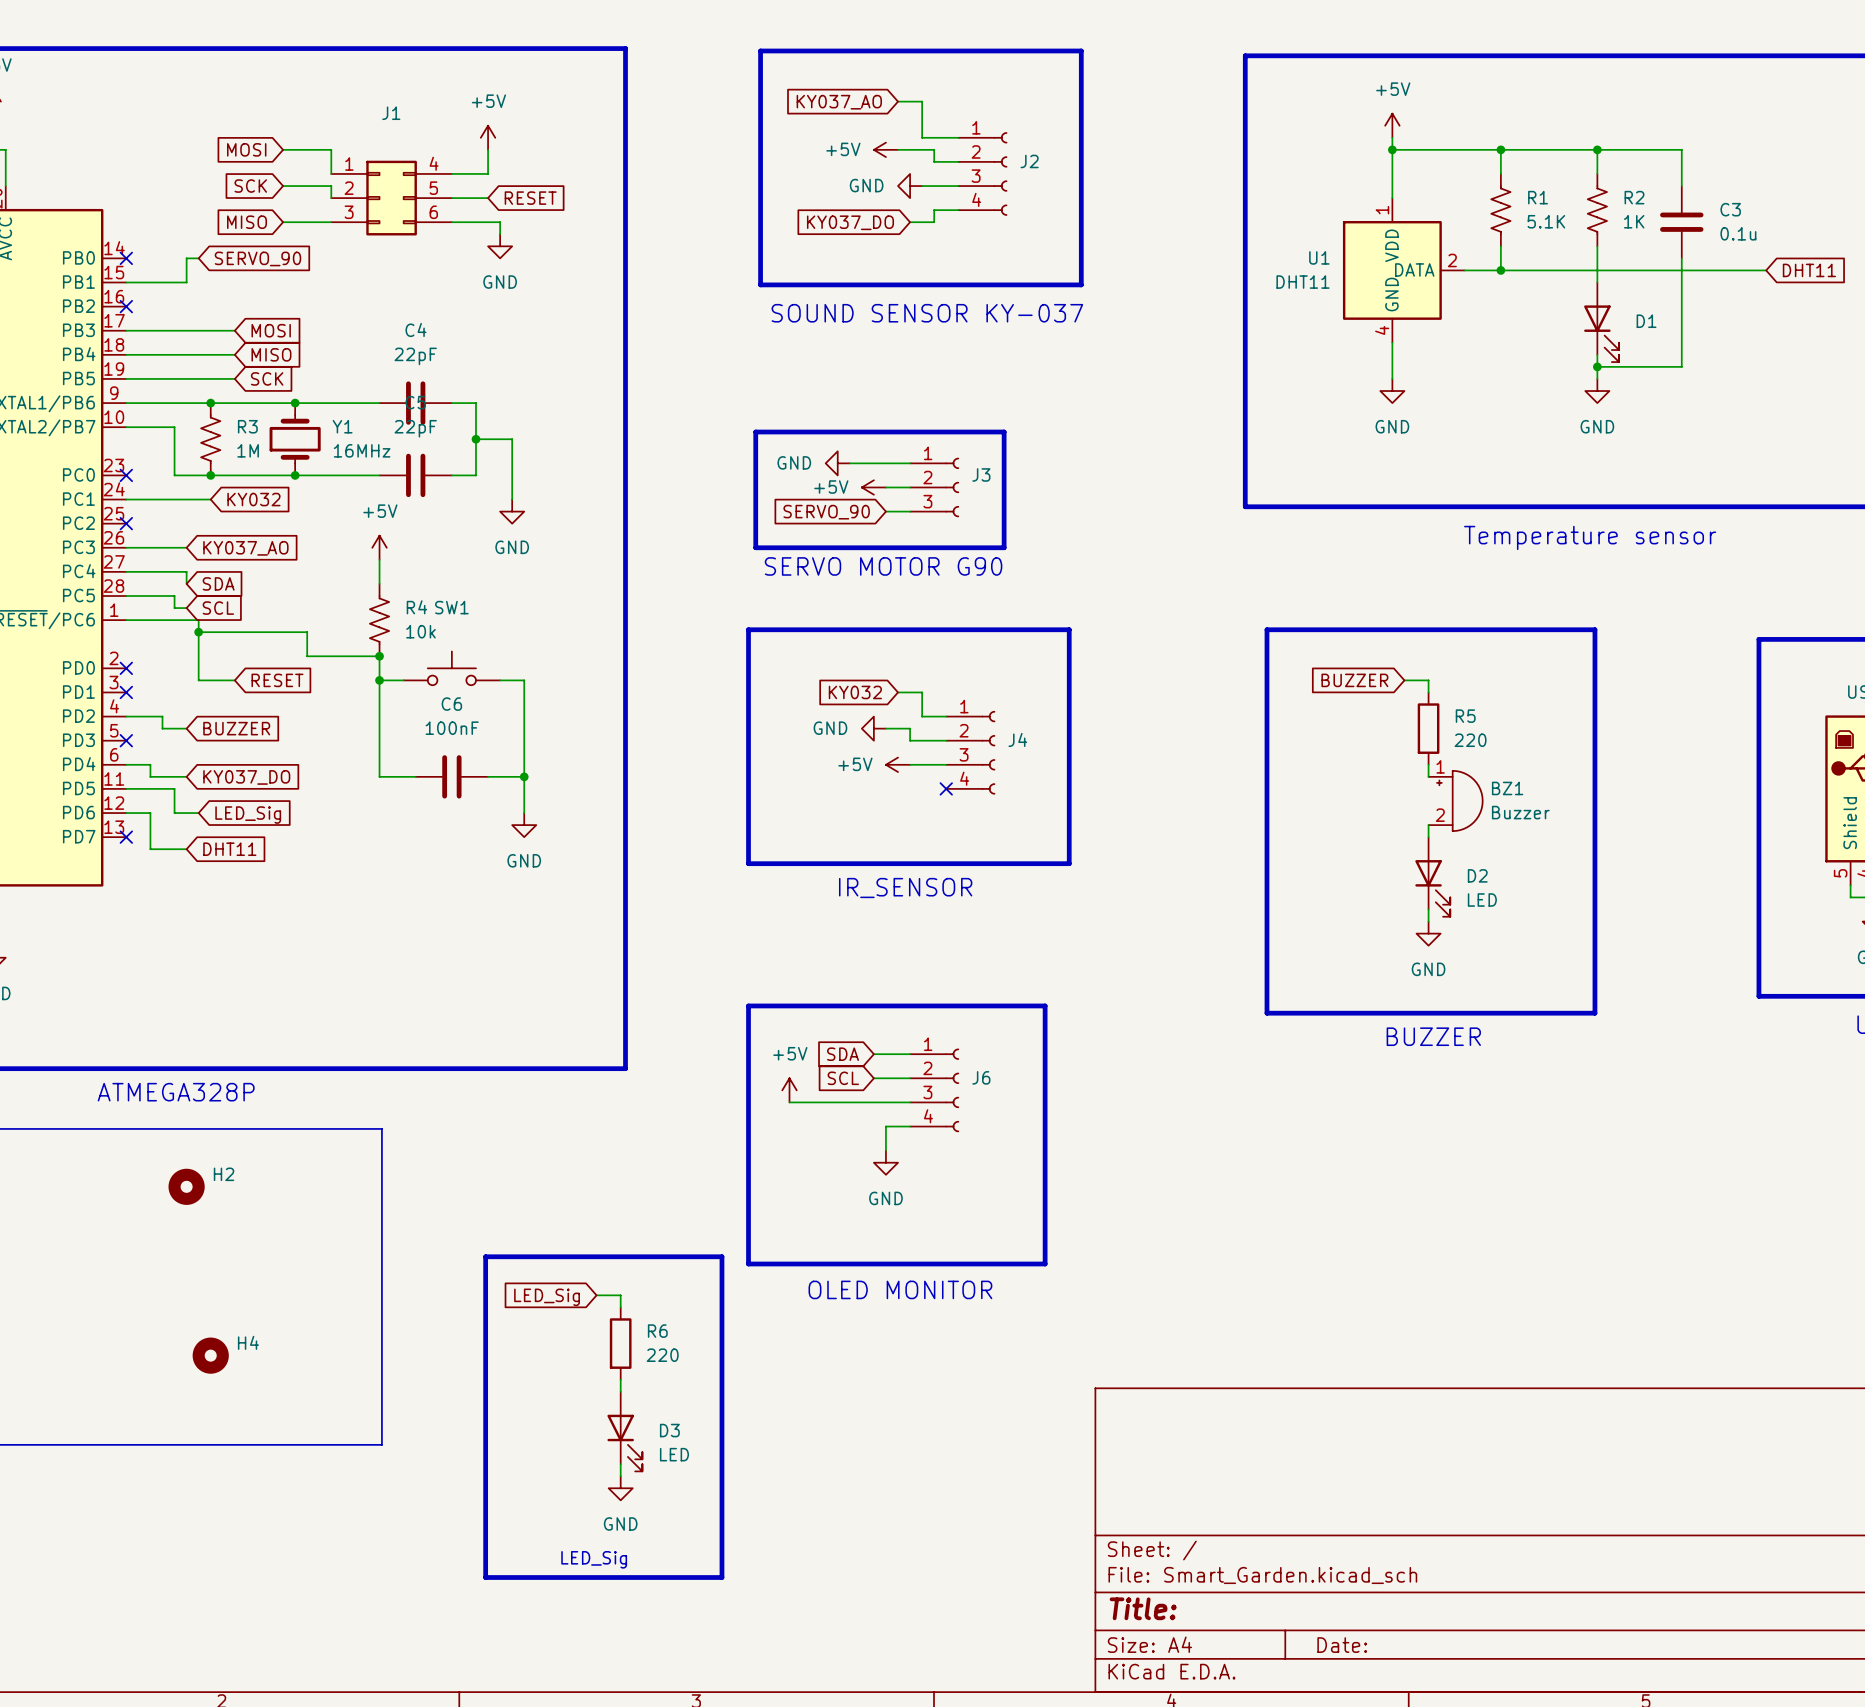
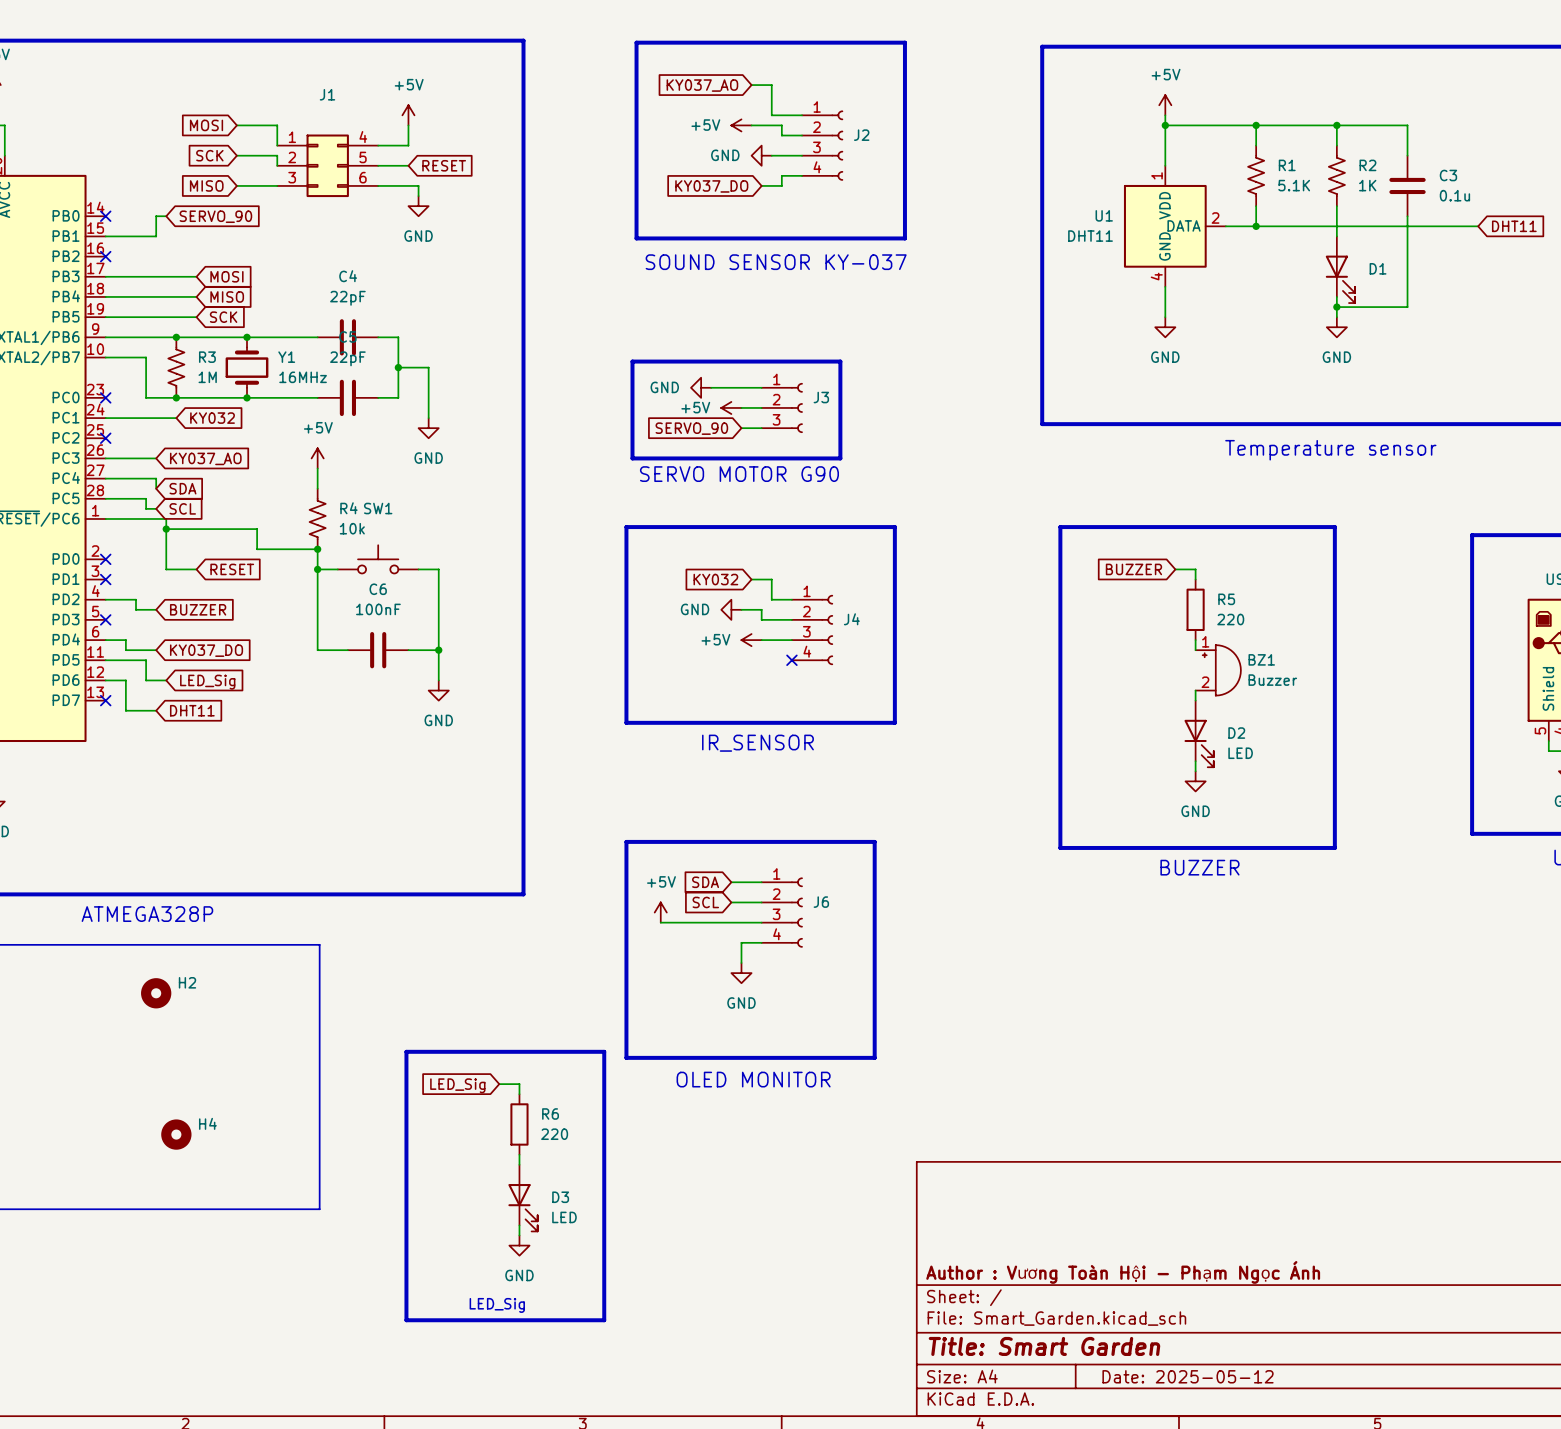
title block: none -> Author : Vương Toàn Hội - Phạm Ngọc Ánh (1123, 1272)
title block: Title: (1143, 1608) -> Title: Smart Garden (1044, 1346)
title block: Date: (1342, 1645) -> Date: 2025-05-12 (1188, 1376)

